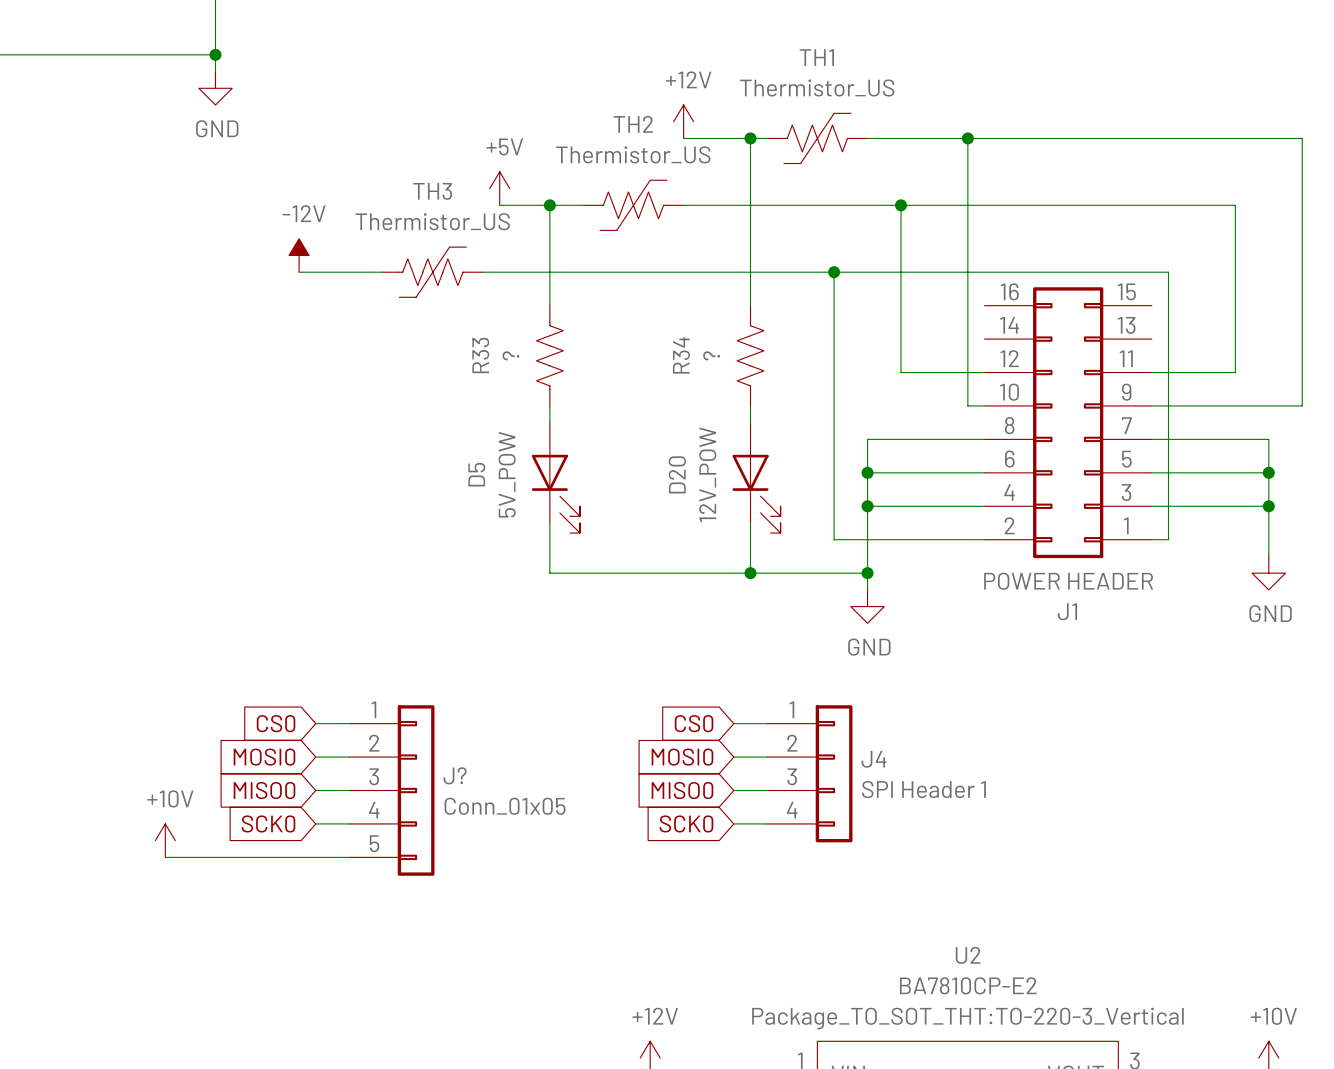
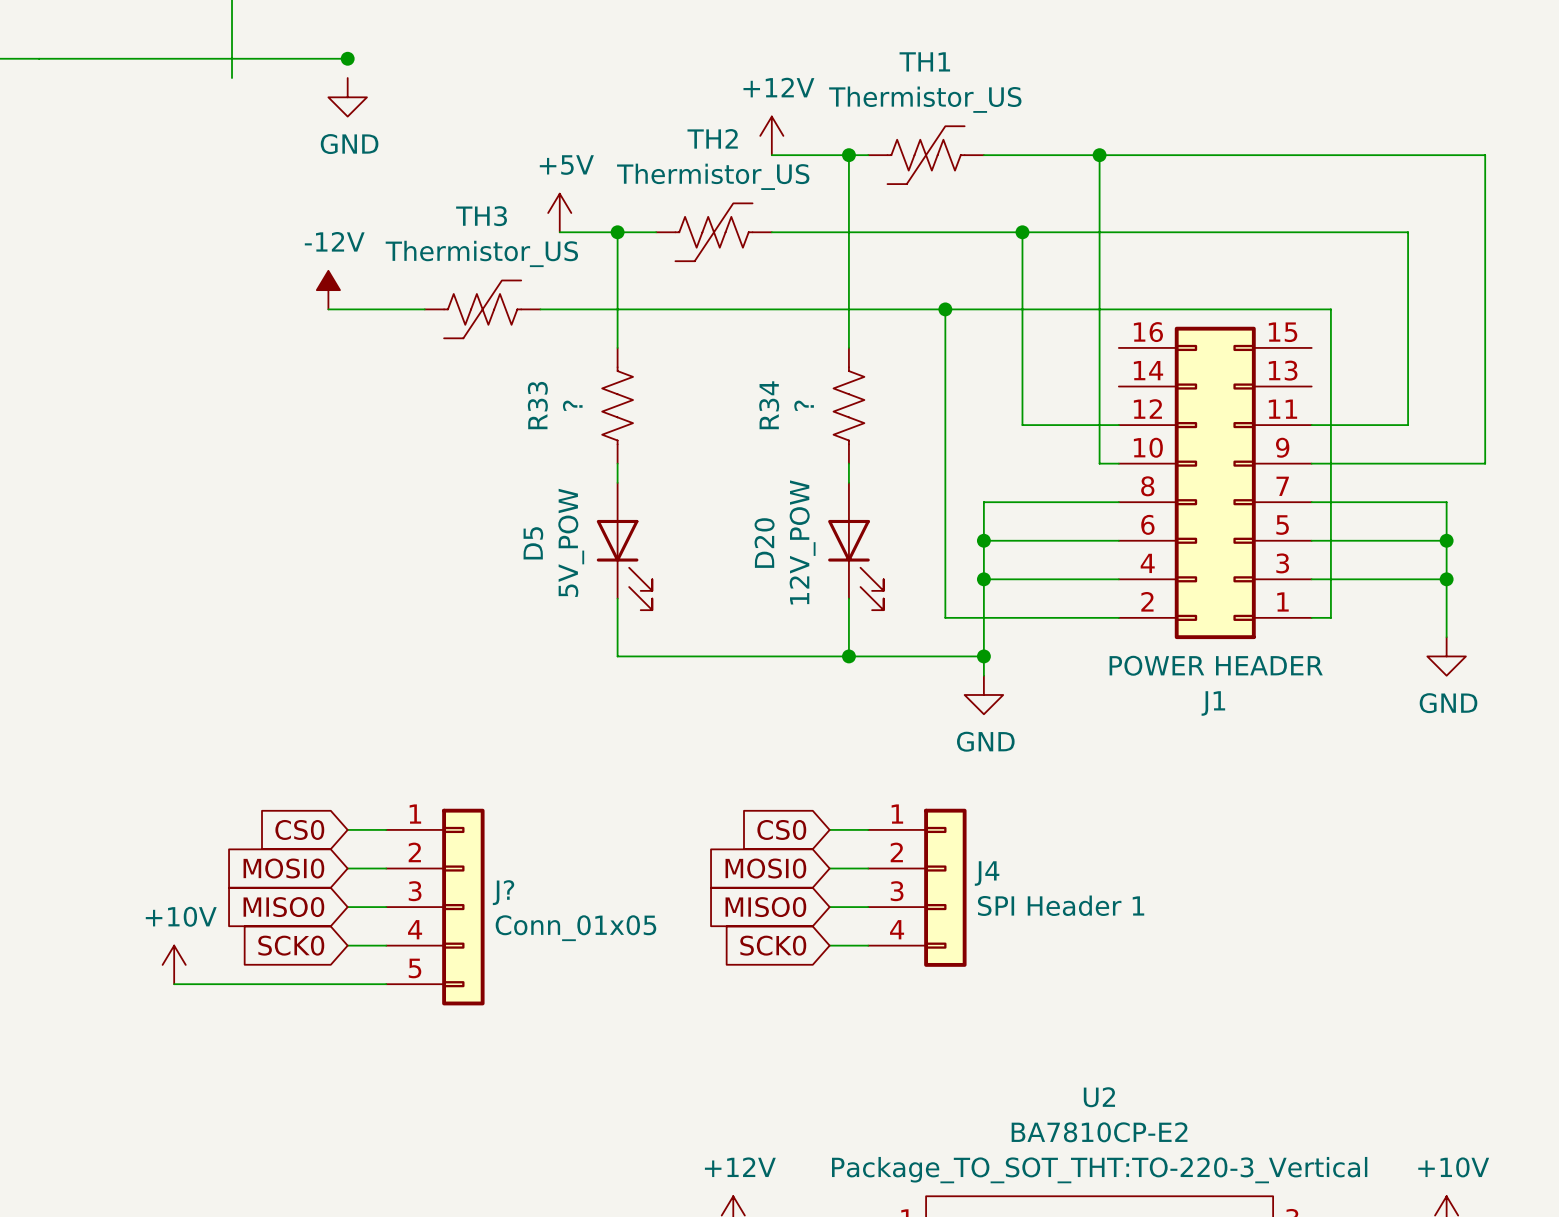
wire: none -> (232, 58) (347, 58)
junction: (215, 54) -> none
junction: none -> (347, 58)
power symbol position: GND (215, 88) -> GND (347, 97)

